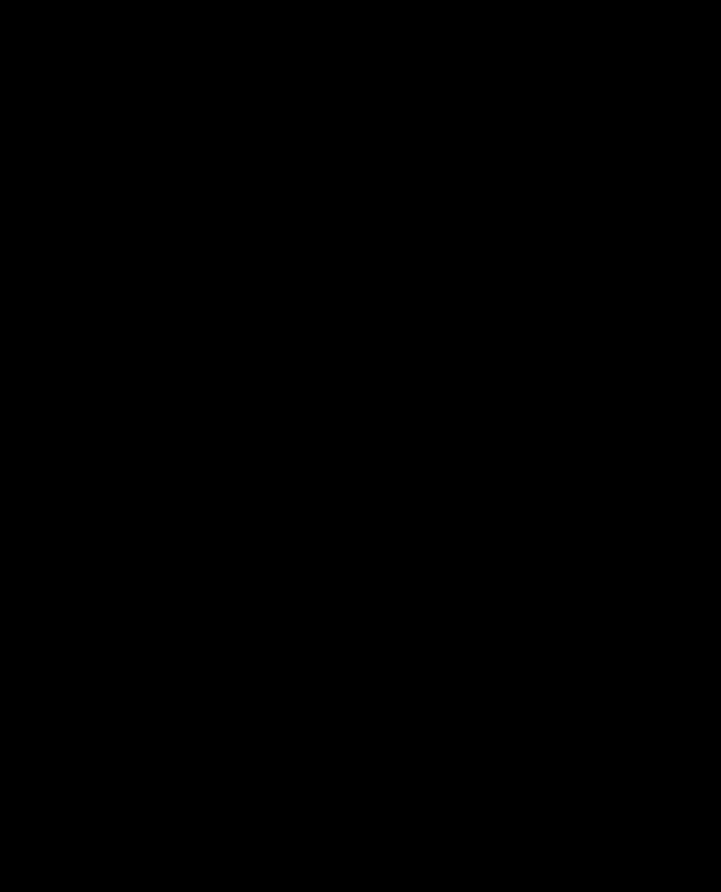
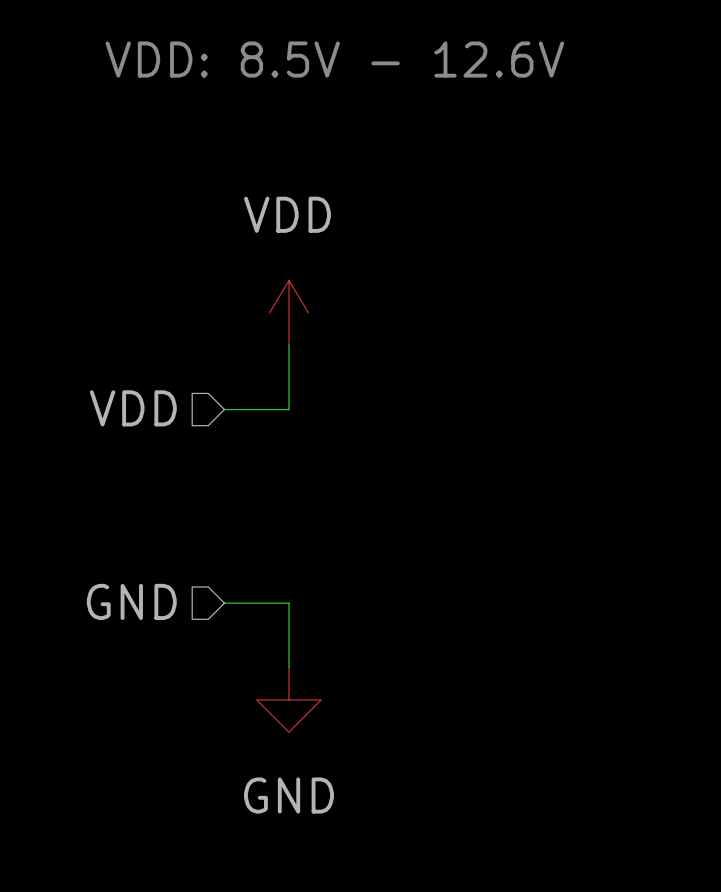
text: none -> VDD: 8.5V - 12.6V (334, 59)
power symbol: none -> VDD (288, 312)
wire: none -> (288, 345) (288, 409) (224, 409)
hierarchical label: none -> VDD (133, 408)
hierarchical label: none -> GND (131, 601)
wire: none -> (224, 603) (288, 603) (288, 667)
power symbol: none -> GND (288, 699)

